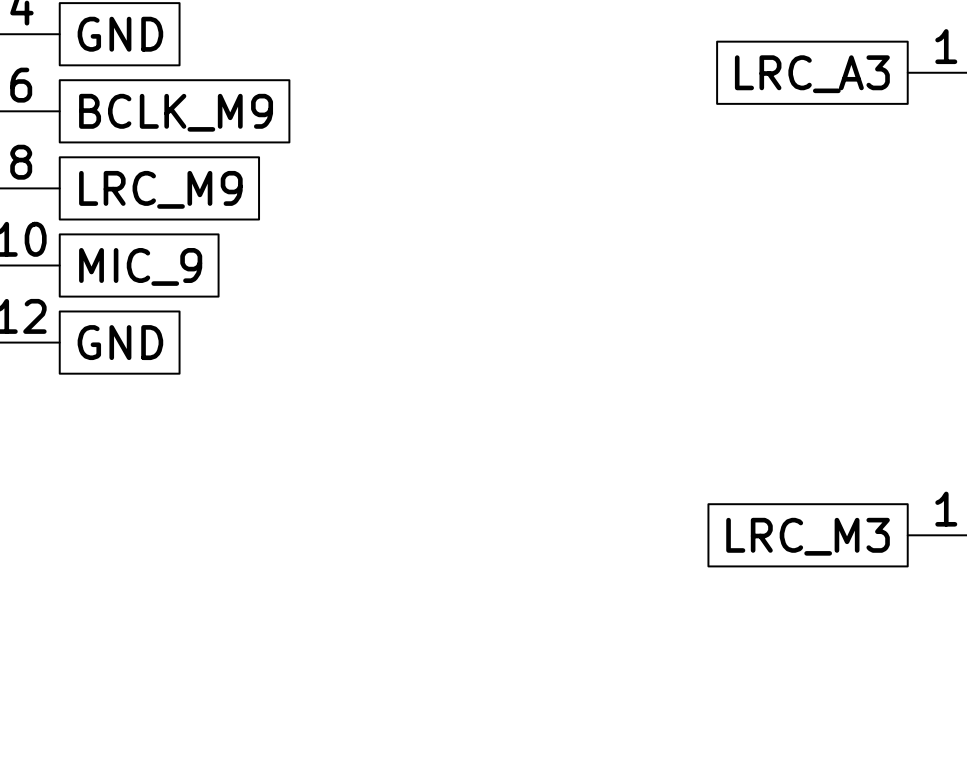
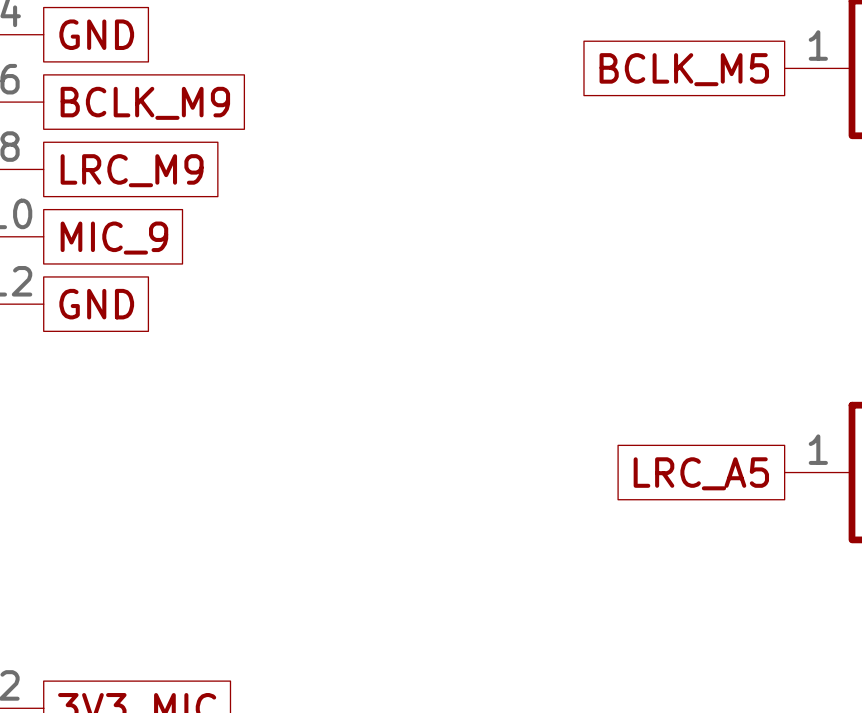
global label: LRC_A3 (812, 74) -> BCLK_M5 (684, 69)
global label: LRC_M3 (808, 536) -> LRC_A5 (701, 473)

